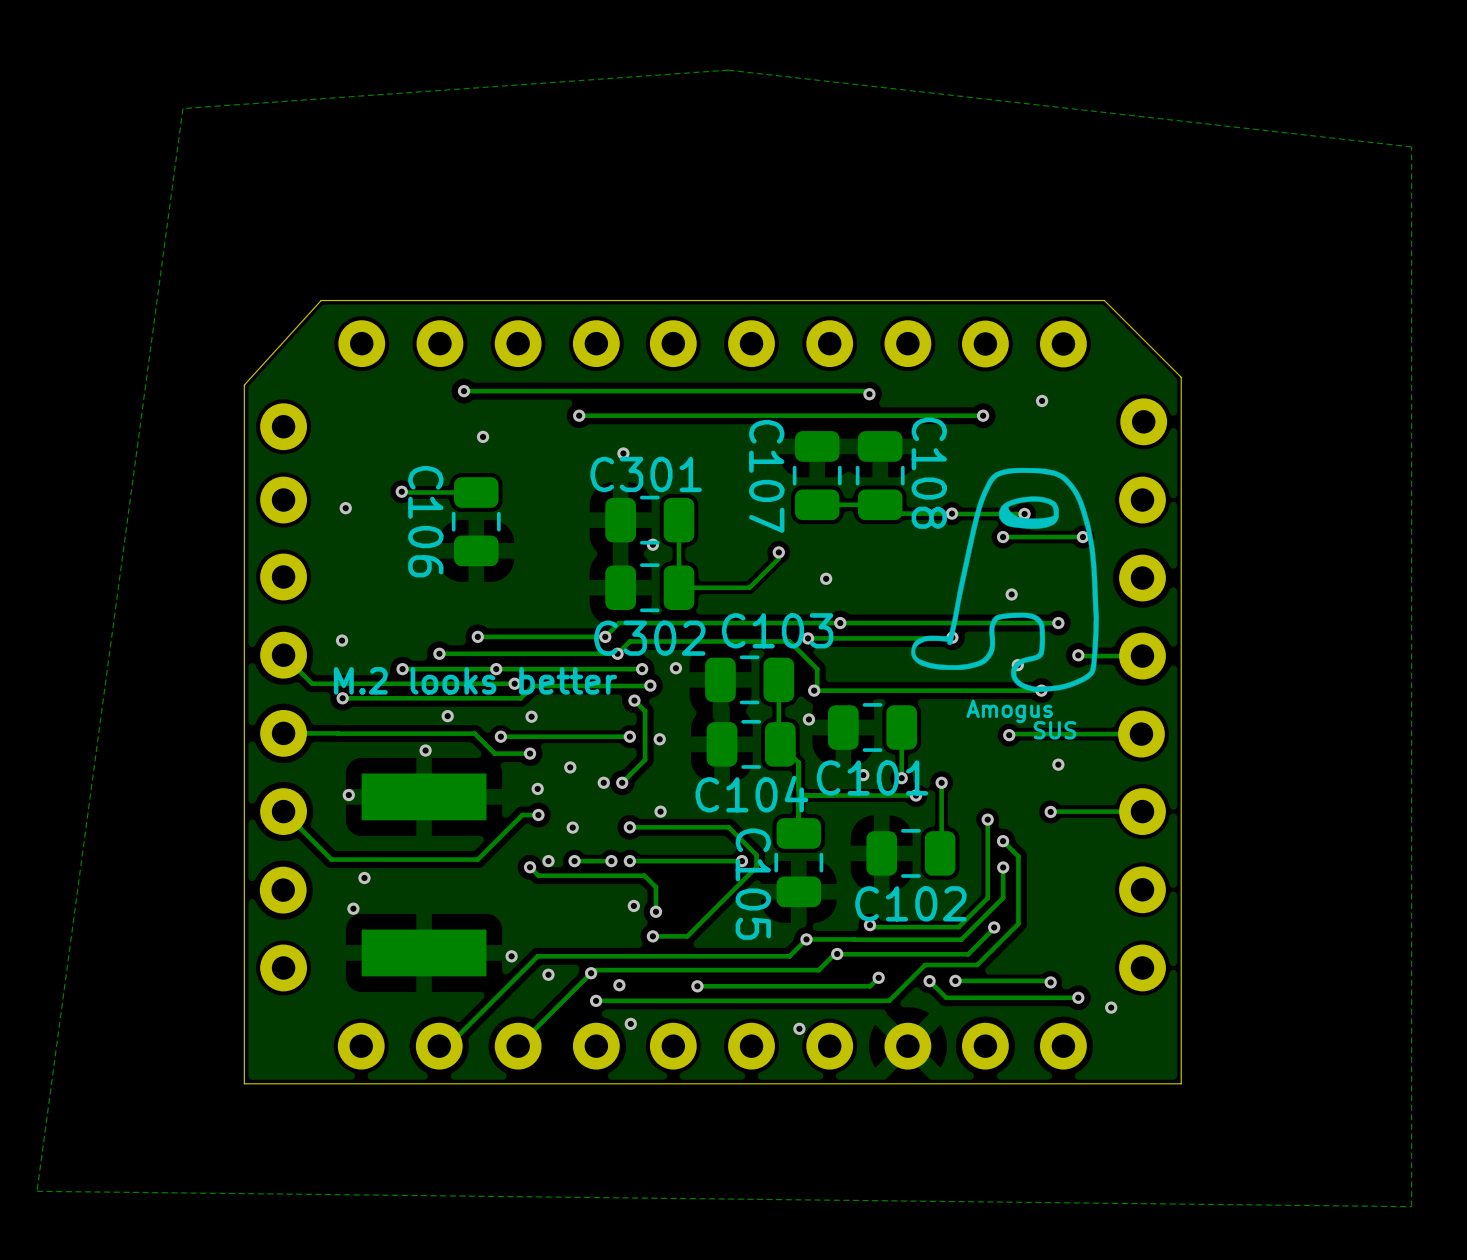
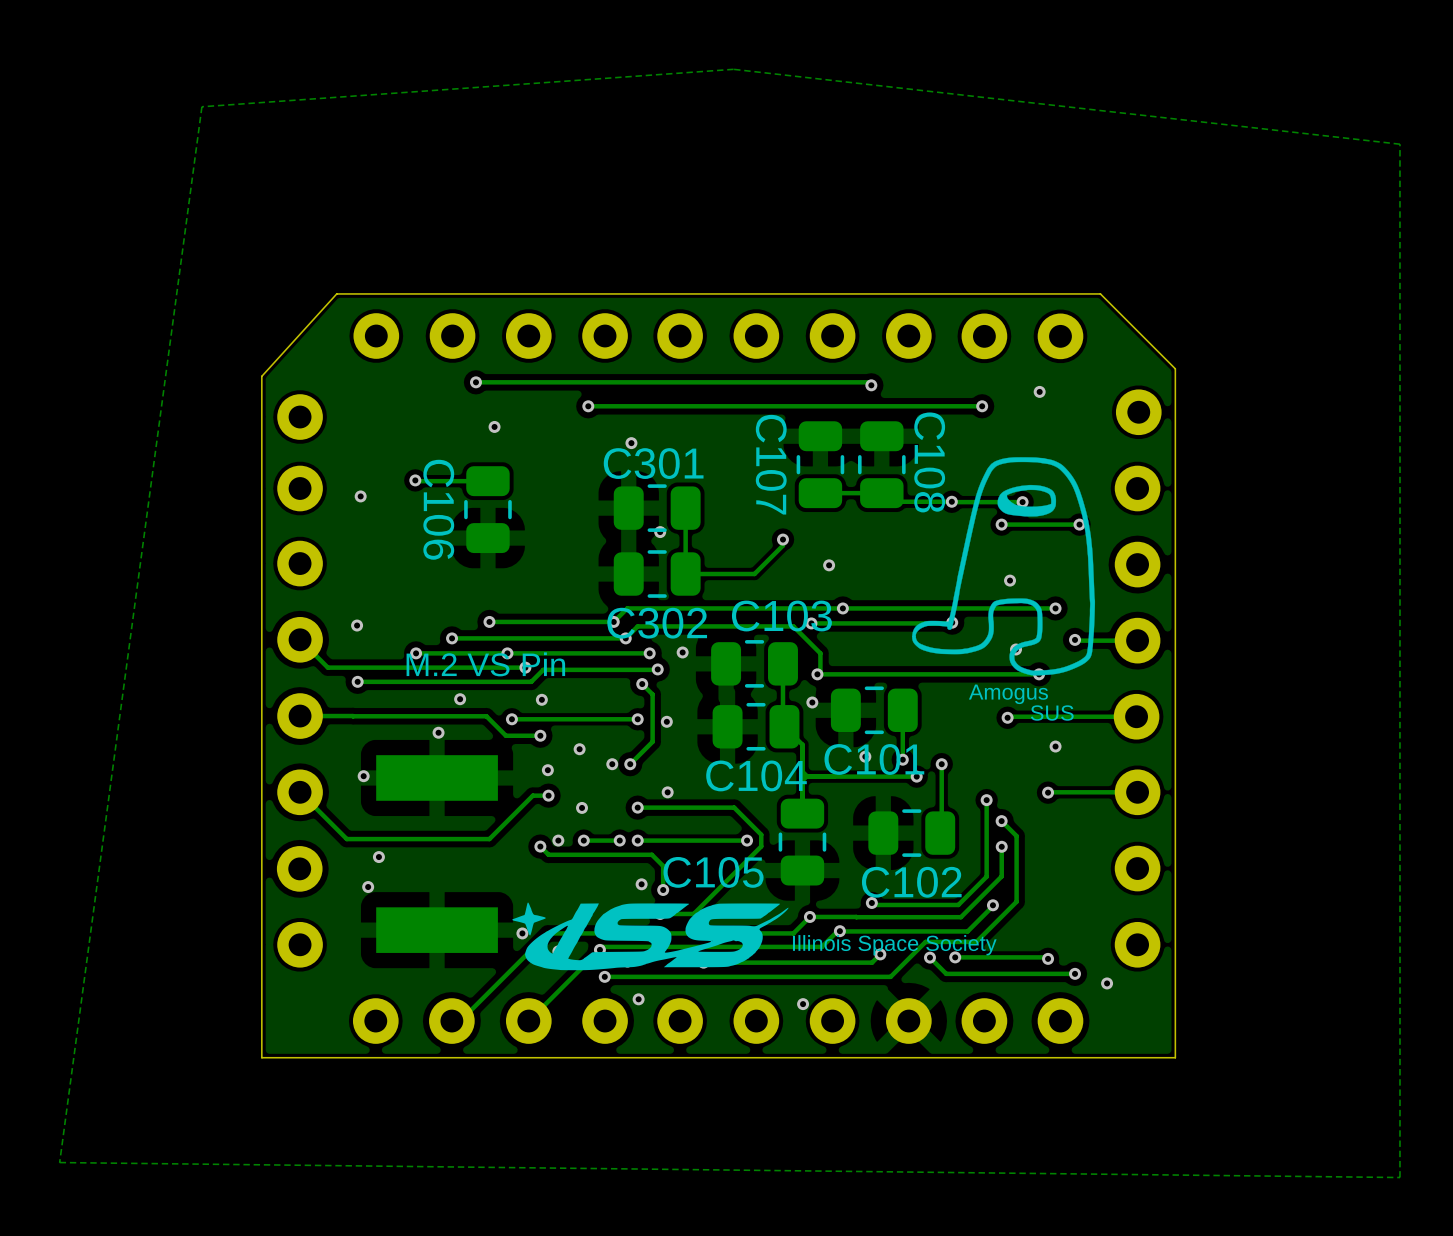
text: M.2 looks better (475, 680) -> M.2 VS Pin (485, 664)
C105 name rotation: 0° (753, 884) -> 90° counterclockwise (713, 872)
drawing: none -> [512, 902, 789, 971]
text: none -> Illinois Space Society (894, 945)

